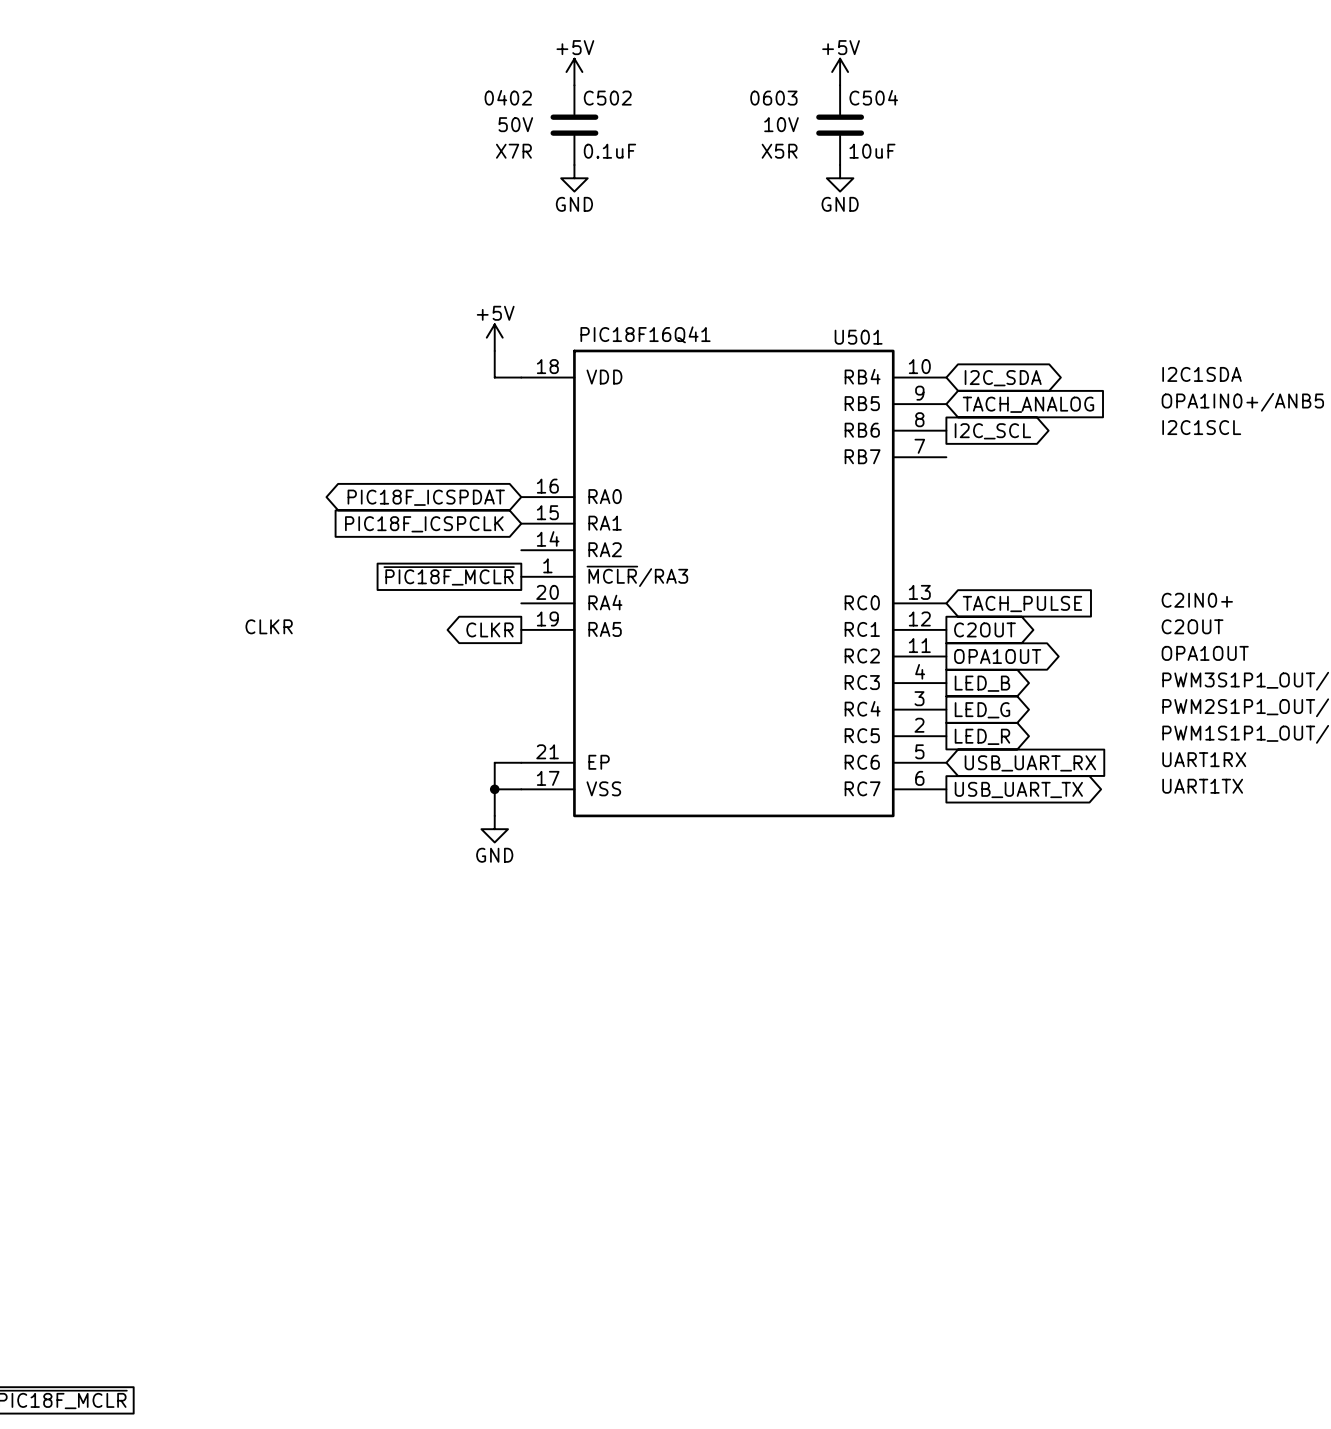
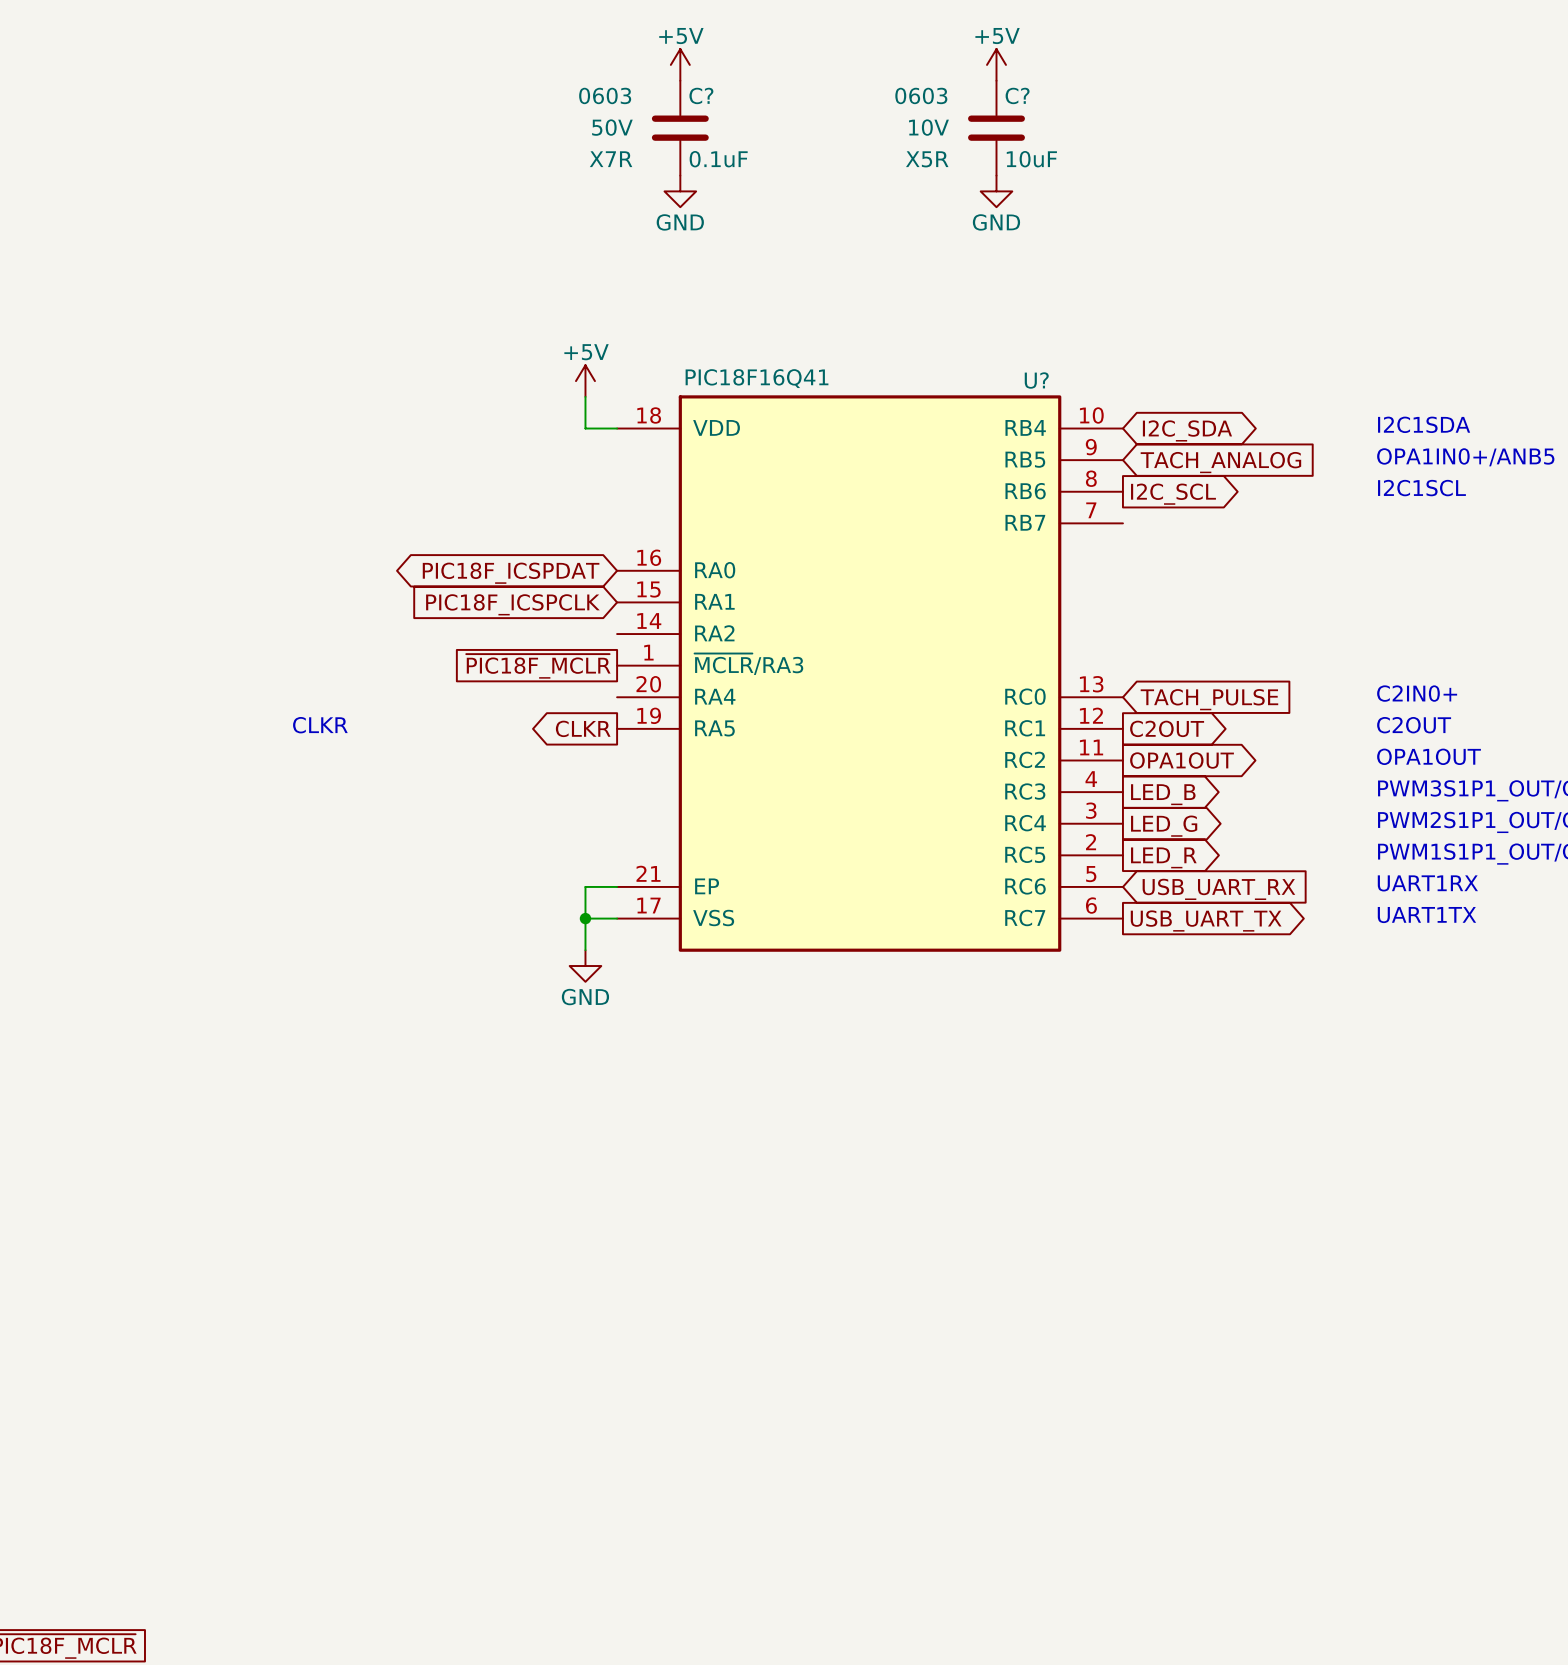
C502 text: 0402 (508, 97) -> 0603 (605, 95)
C504 name: C504 (873, 97) -> C? (1017, 95)
C502 name: C502 (607, 98) -> C? (701, 95)
U501 name: U501 (858, 337) -> U? (1036, 380)

